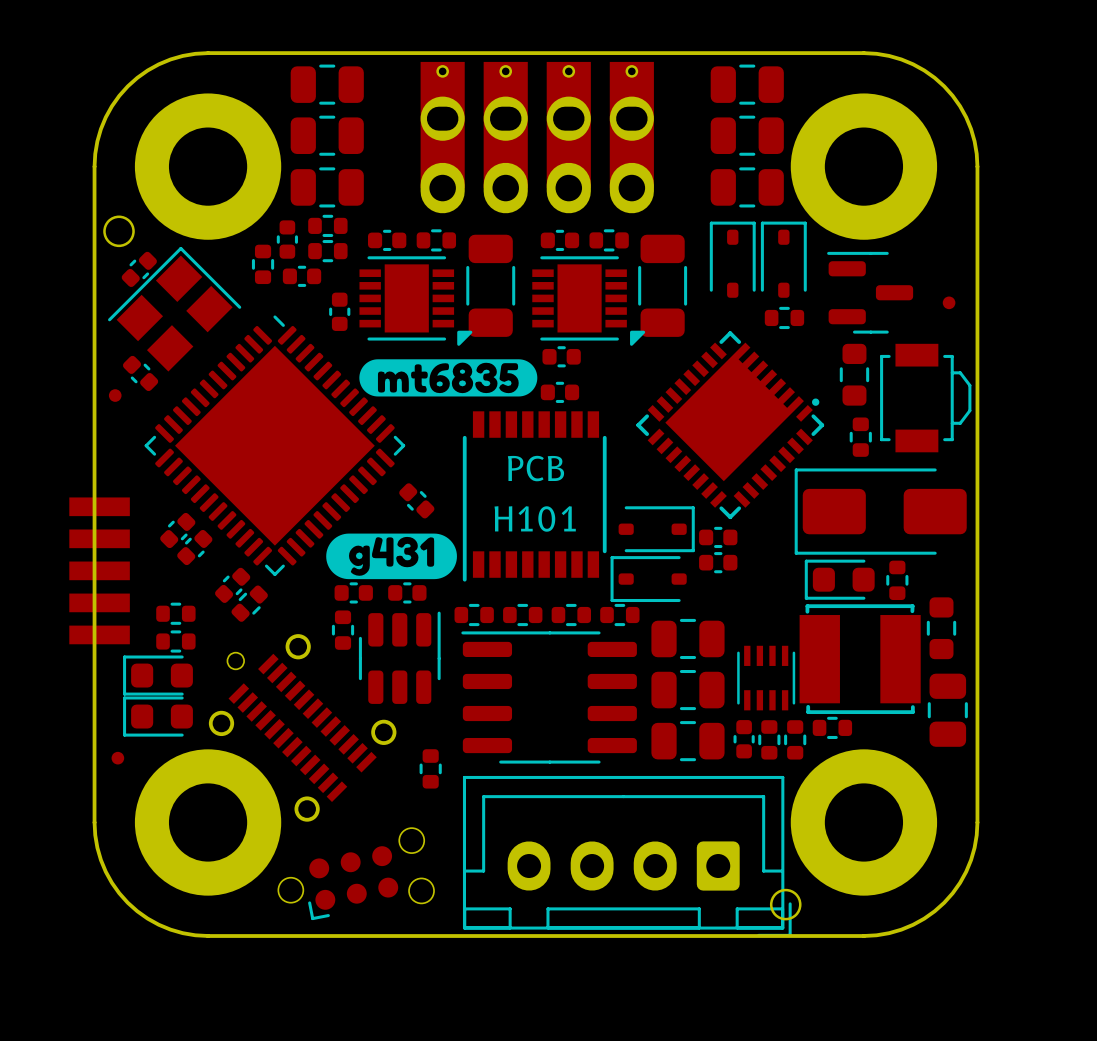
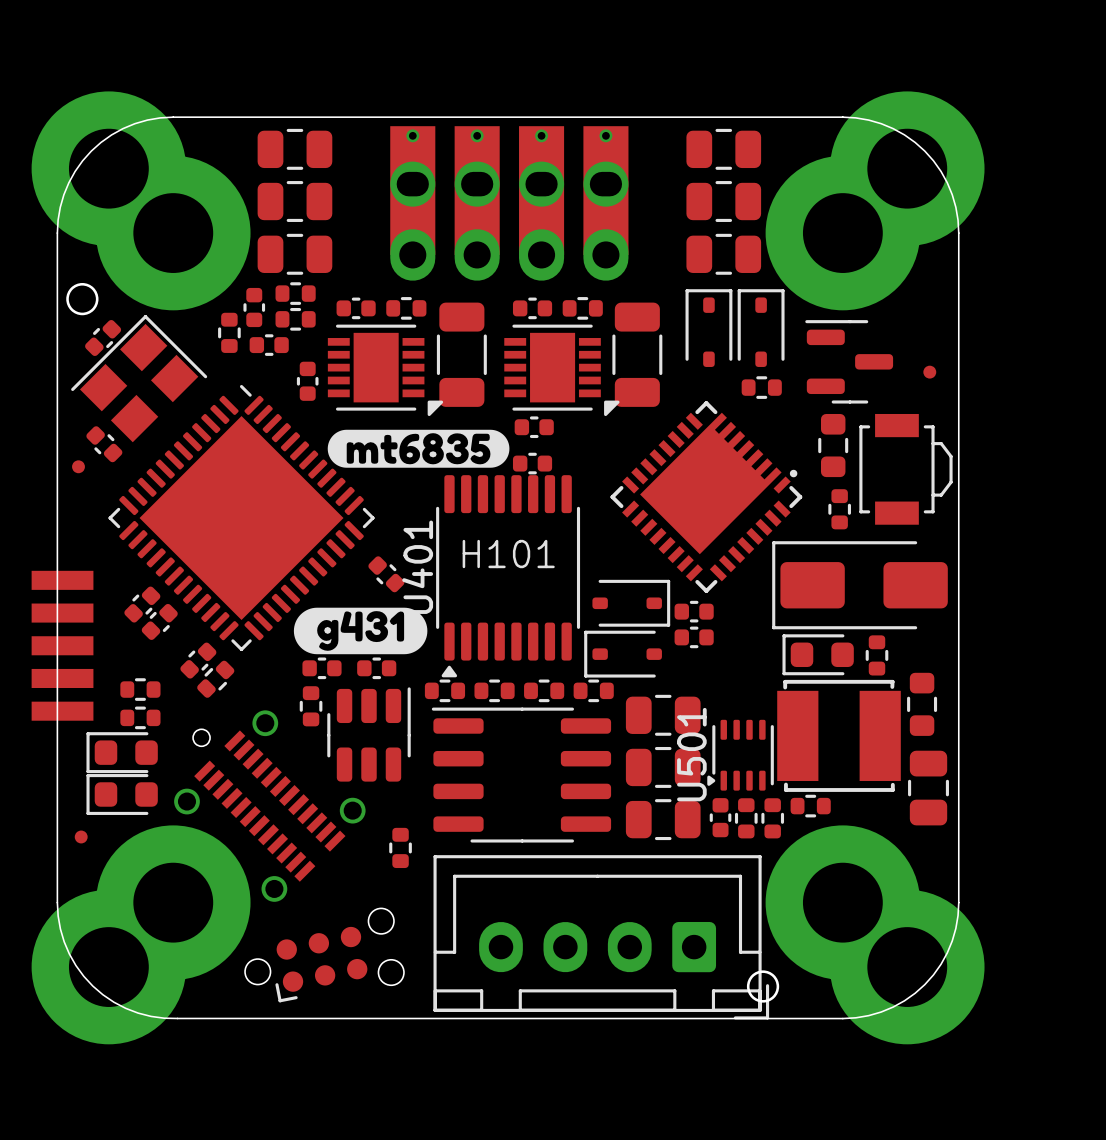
H101 footprint: [92, 51, 980, 938] -> [31, 91, 985, 1045]
H101 value: PCB (535, 468) -> none
part: (534, 496) -> none
U401: none -> (508, 576)
U501: none -> (740, 755)
part: (763, 679) -> none

